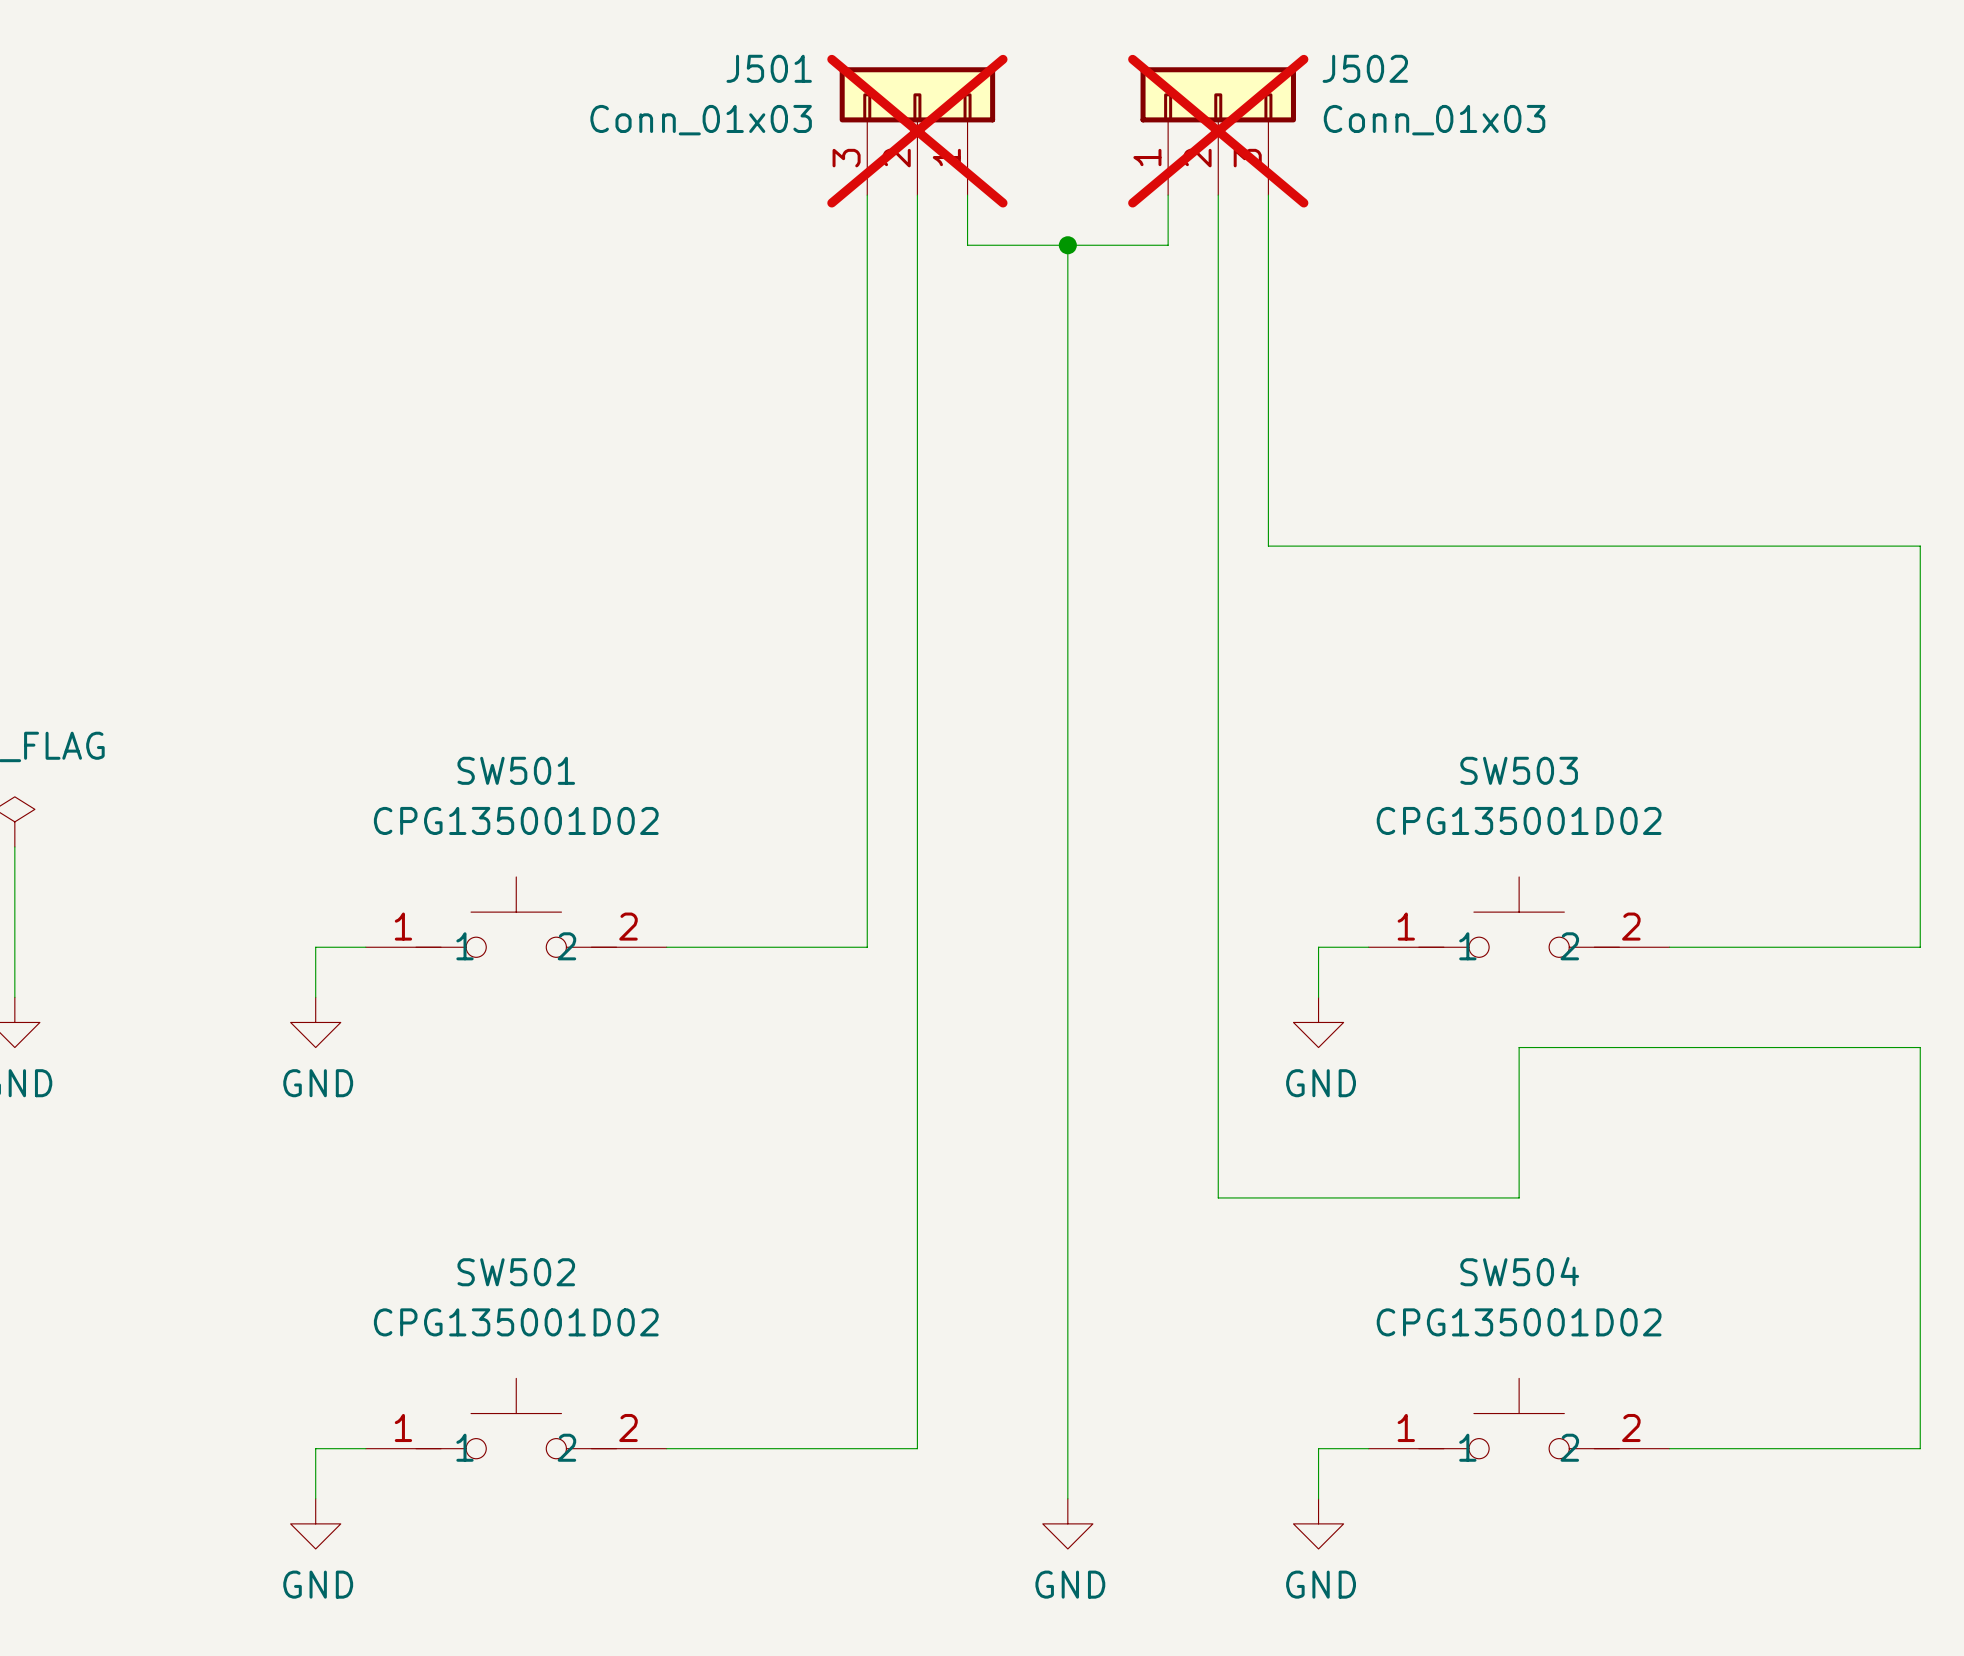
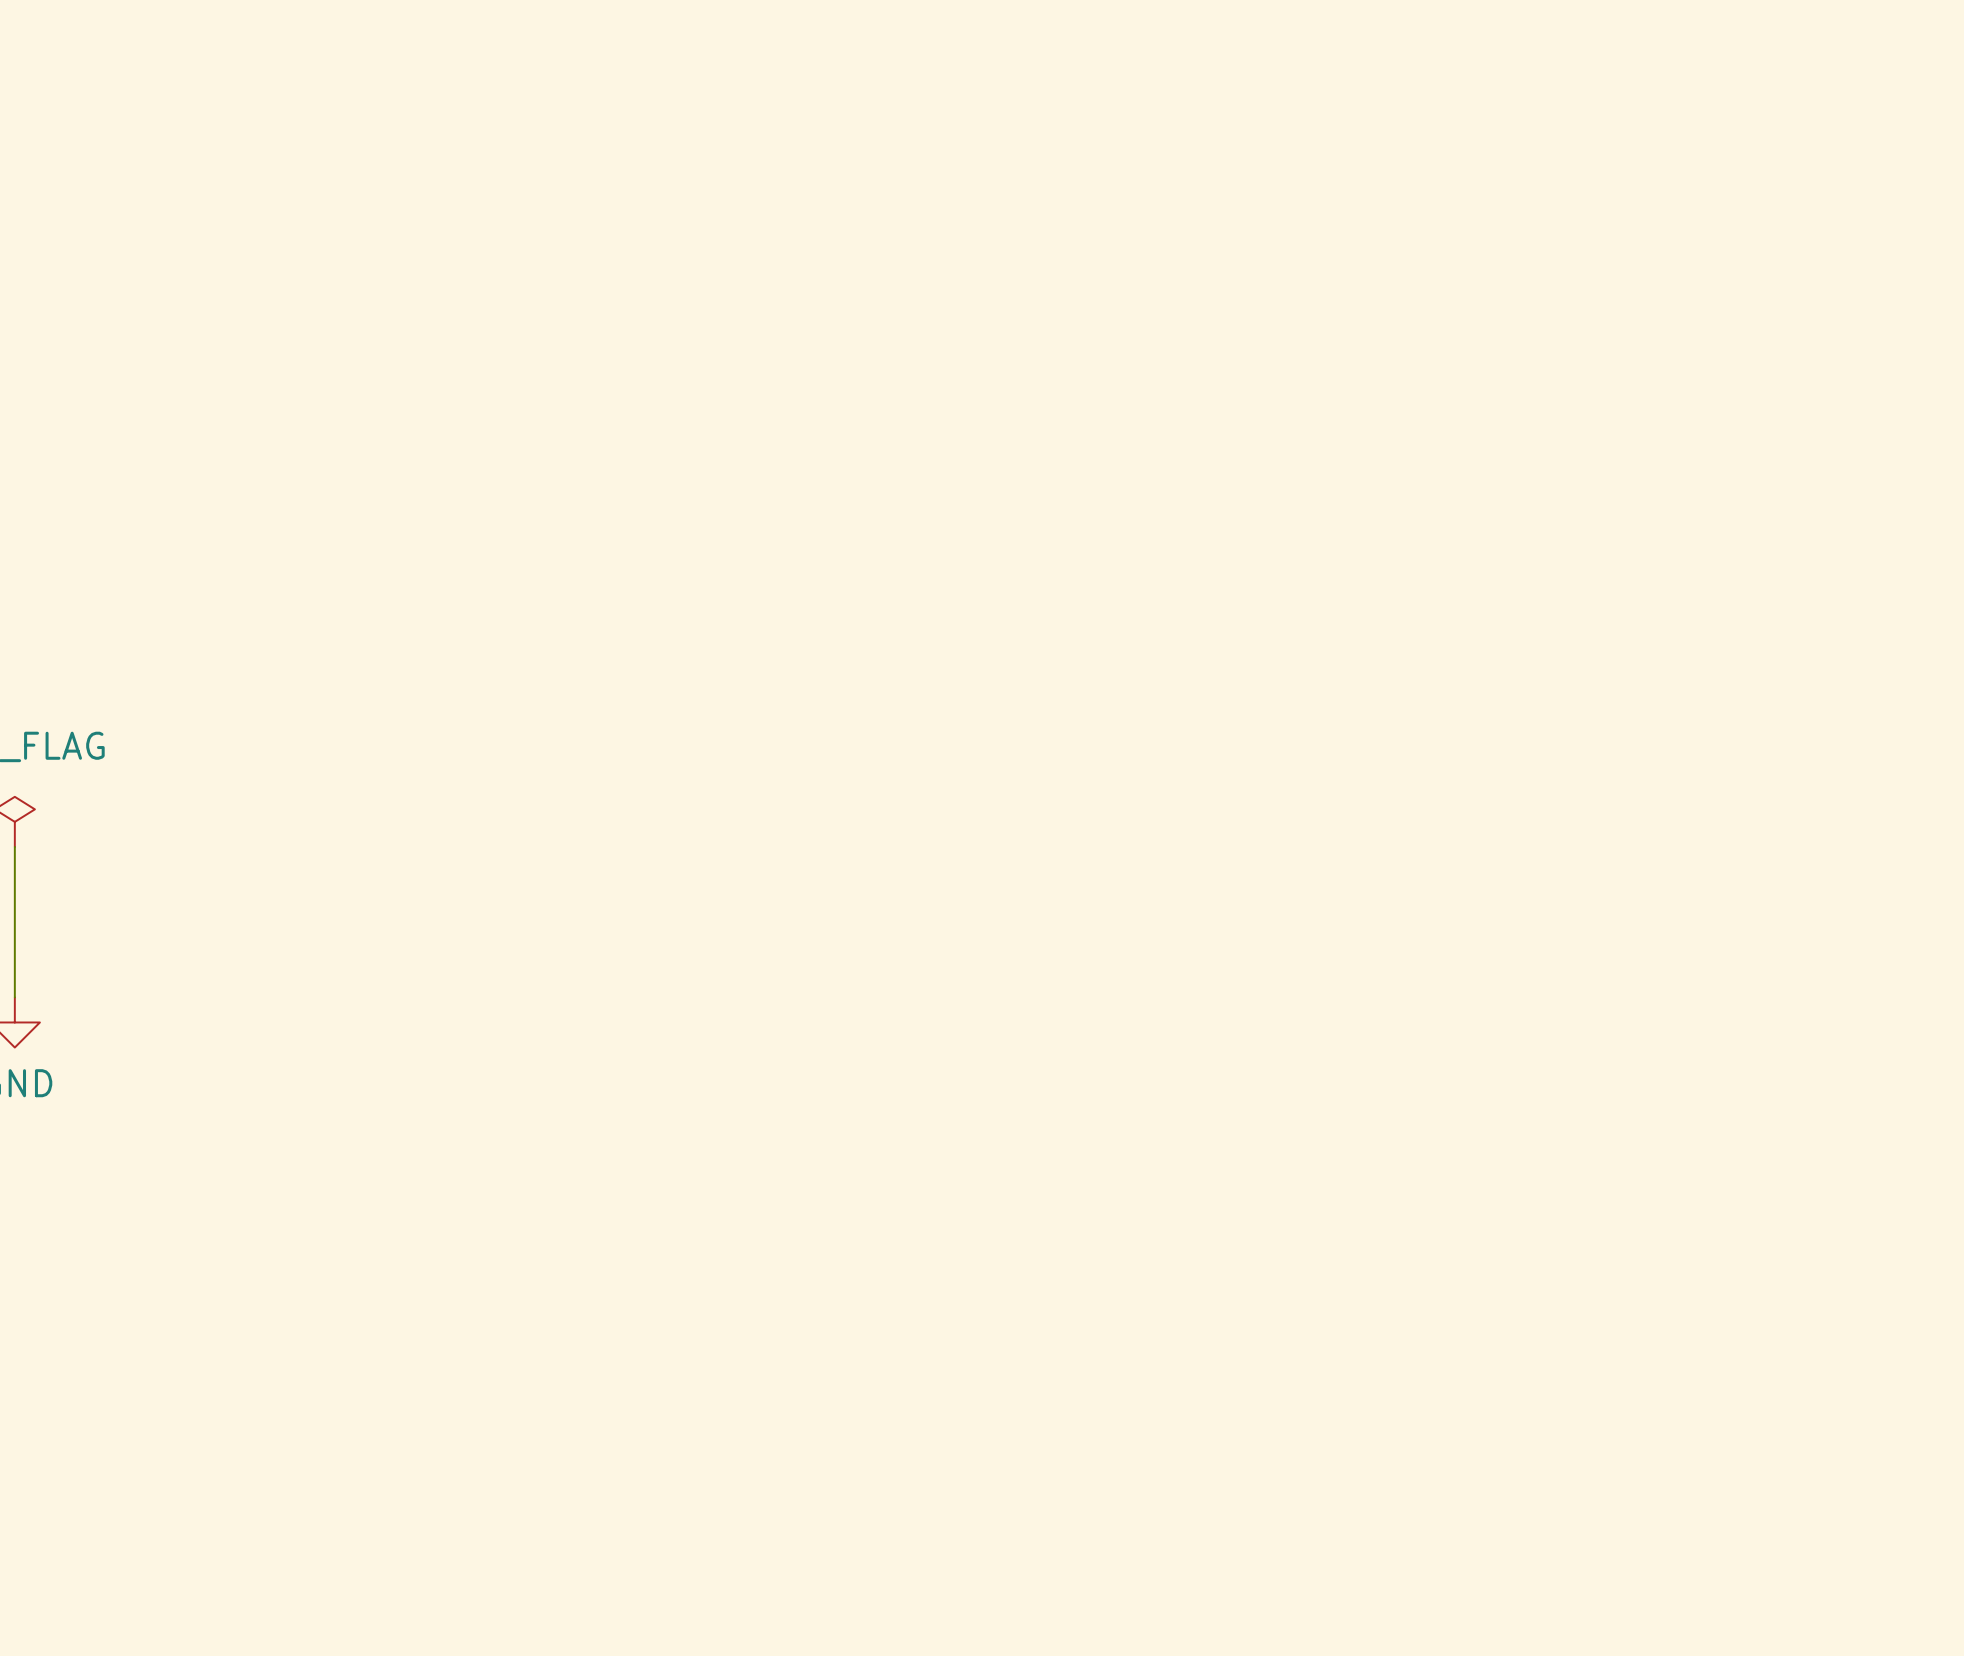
J501: Conn_01x03 (917, 131) -> none
J502: Conn_01x03 (1218, 131) -> none
wire: (867, 195) (867, 947) (666, 947) -> none
wire: (917, 195) (917, 1448) (666, 1448) -> none
wire: (967, 195) (967, 245) (1168, 245) (1168, 195) -> none
wire: (1218, 195) (1218, 1197) (1519, 1197) (1519, 1047) (1920, 1047) (1920, 1448) (1669, 1448) -> none
wire: (1268, 195) (1268, 546) (1920, 546) (1920, 947) (1669, 947) -> none
wire: (1067, 245) (1067, 1498) -> none
junction: (1067, 245) -> none
SW501: CPG135001D02 (516, 917) -> none
SW503: CPG135001D02 (1519, 917) -> none
wire: (365, 947) (315, 947) (315, 997) -> none
wire: (1368, 947) (1318, 947) (1318, 997) -> none
power symbol: GND (315, 1022) -> none
power symbol: GND (1318, 1022) -> none
SW502: CPG135001D02 (516, 1418) -> none
SW504: CPG135001D02 (1519, 1418) -> none
wire: (365, 1448) (315, 1448) (315, 1498) -> none
wire: (1368, 1448) (1318, 1448) (1318, 1498) -> none
power symbol: GND (315, 1523) -> none
power symbol: GND (1067, 1523) -> none
power symbol: GND (1318, 1523) -> none

